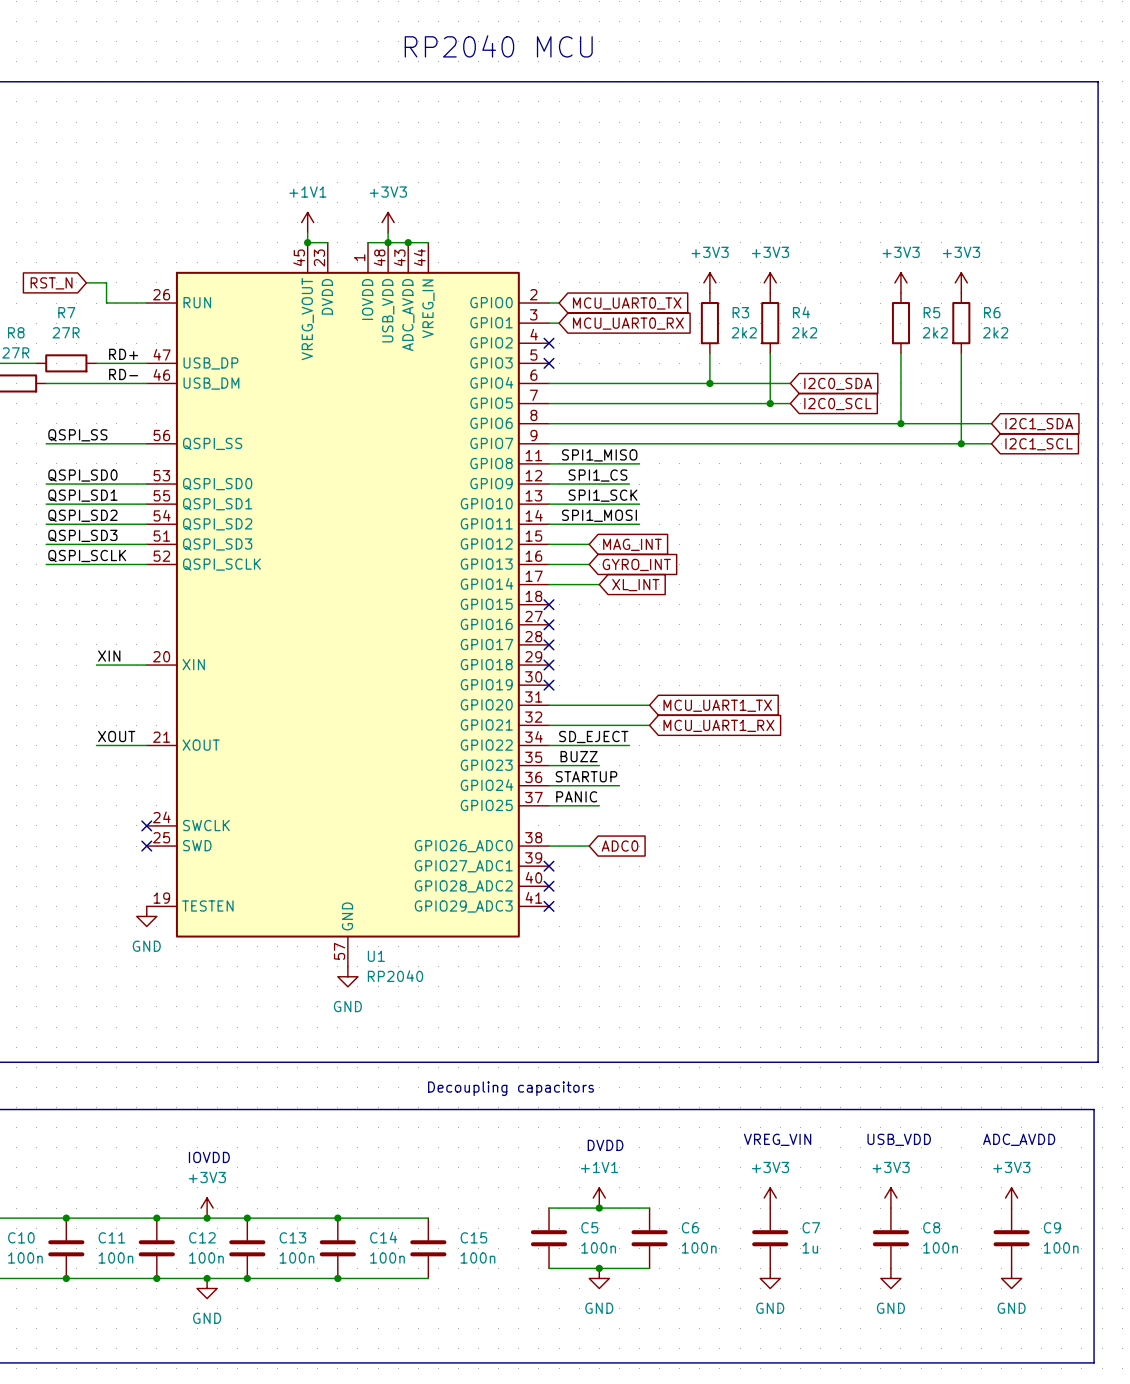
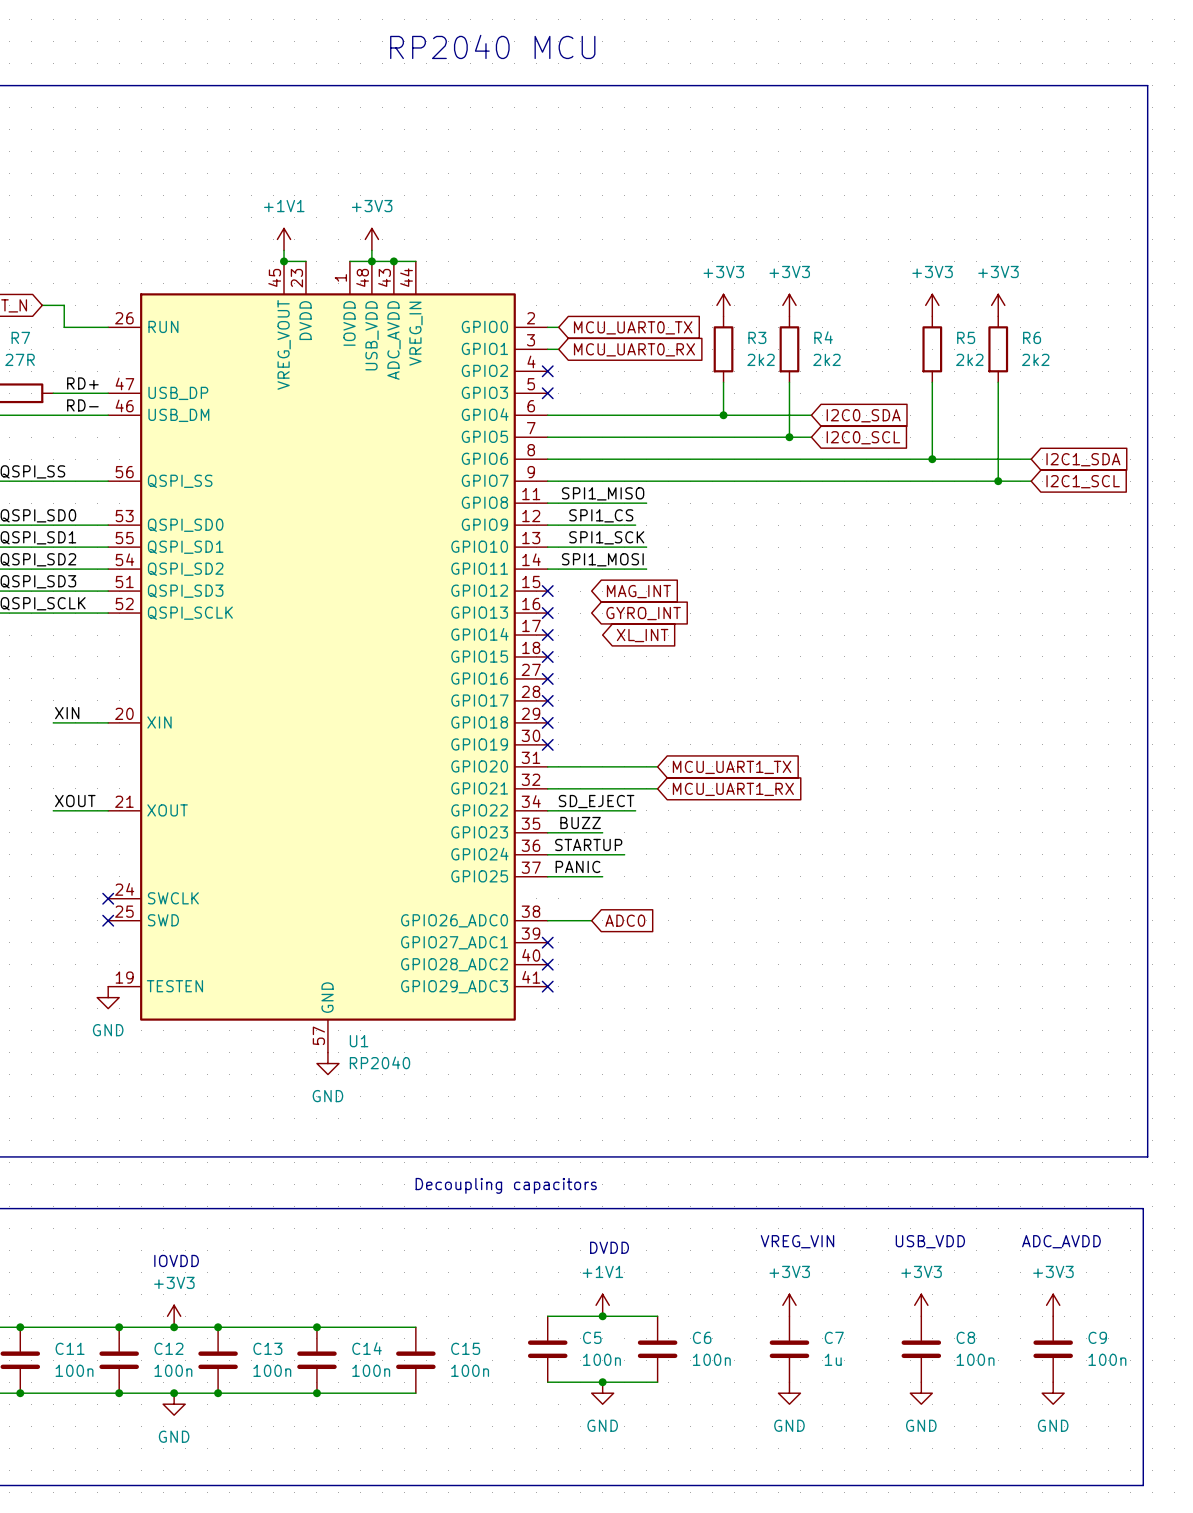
wire: (549, 544) (589, 544) -> none
no-connect mark: none -> (547, 591)
wire: (549, 564) (589, 564) -> none
no-connect mark: none -> (547, 613)
wire: (549, 584) (599, 584) -> none
no-connect mark: none -> (547, 635)

